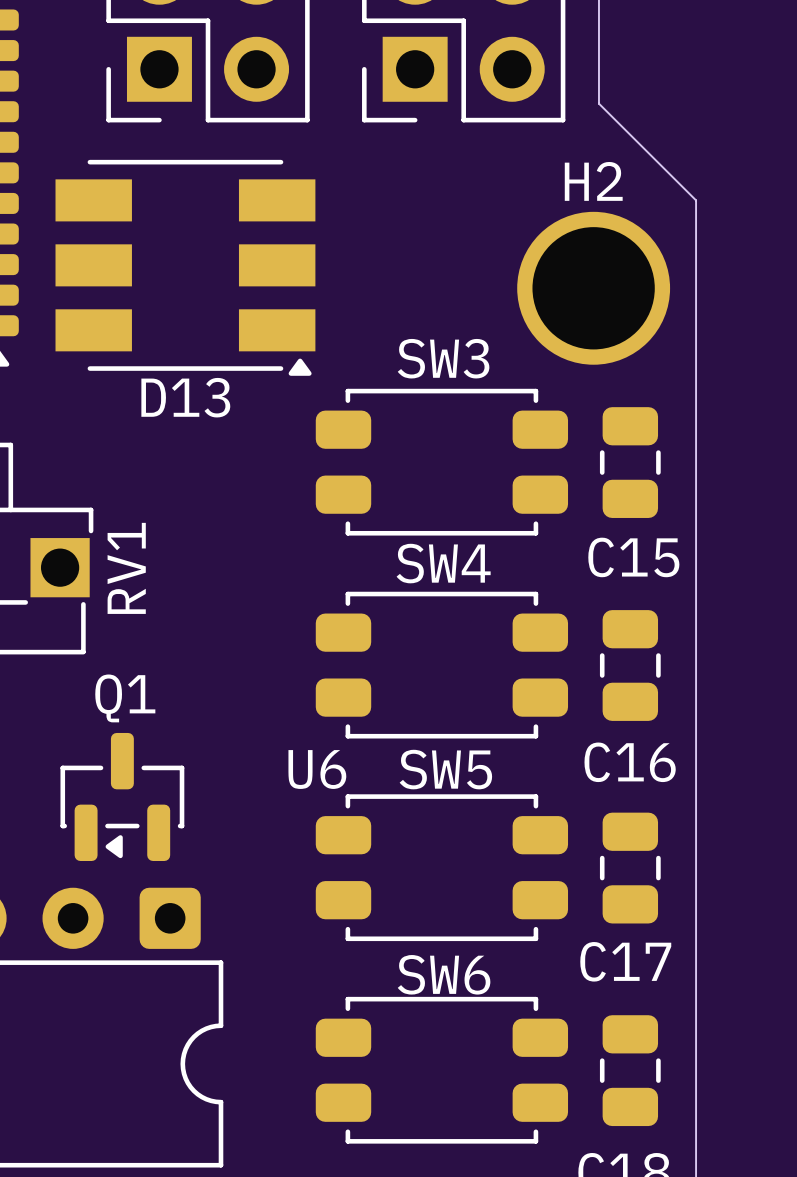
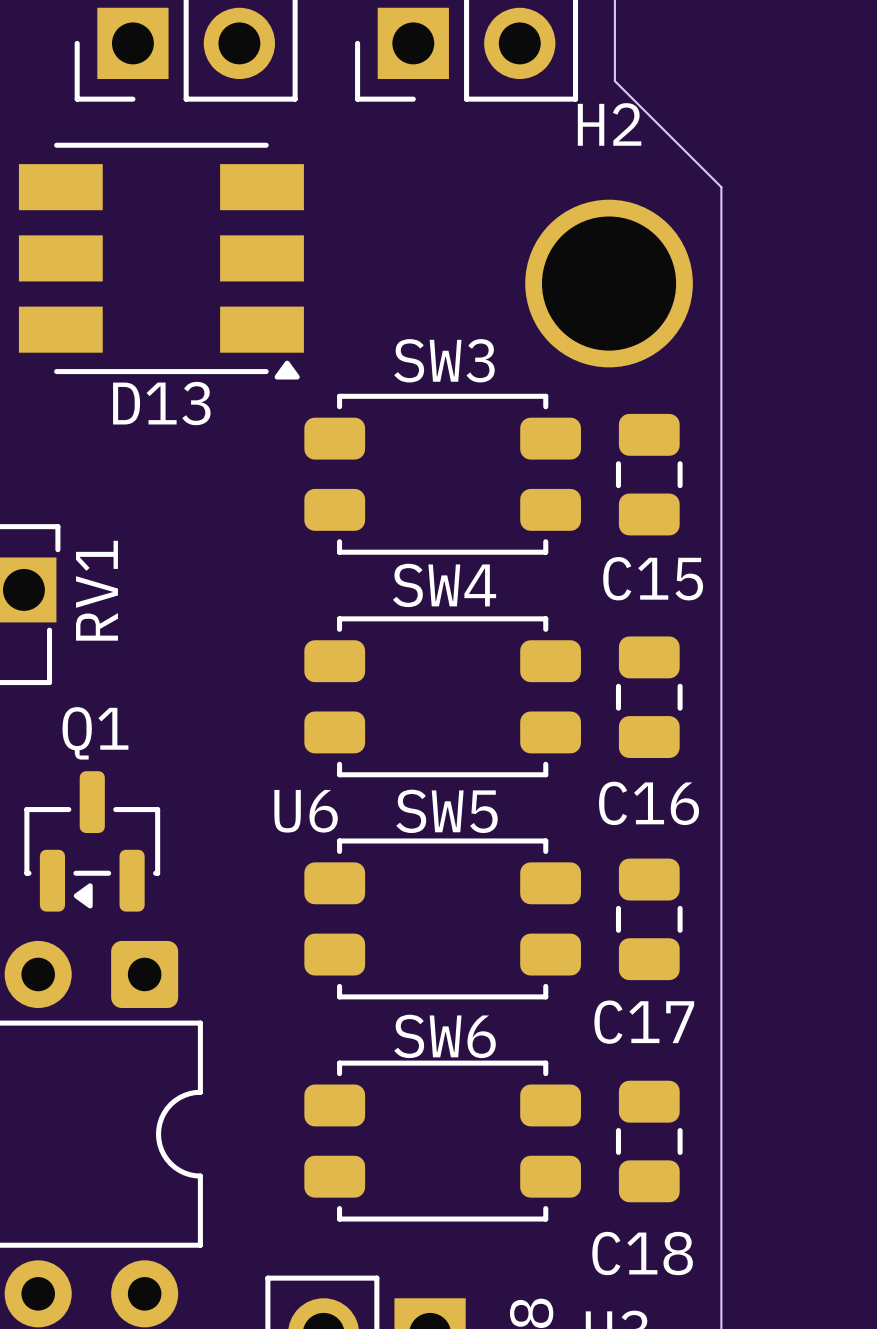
H2 name position: H2 (593, 181) -> H2 (609, 124)

